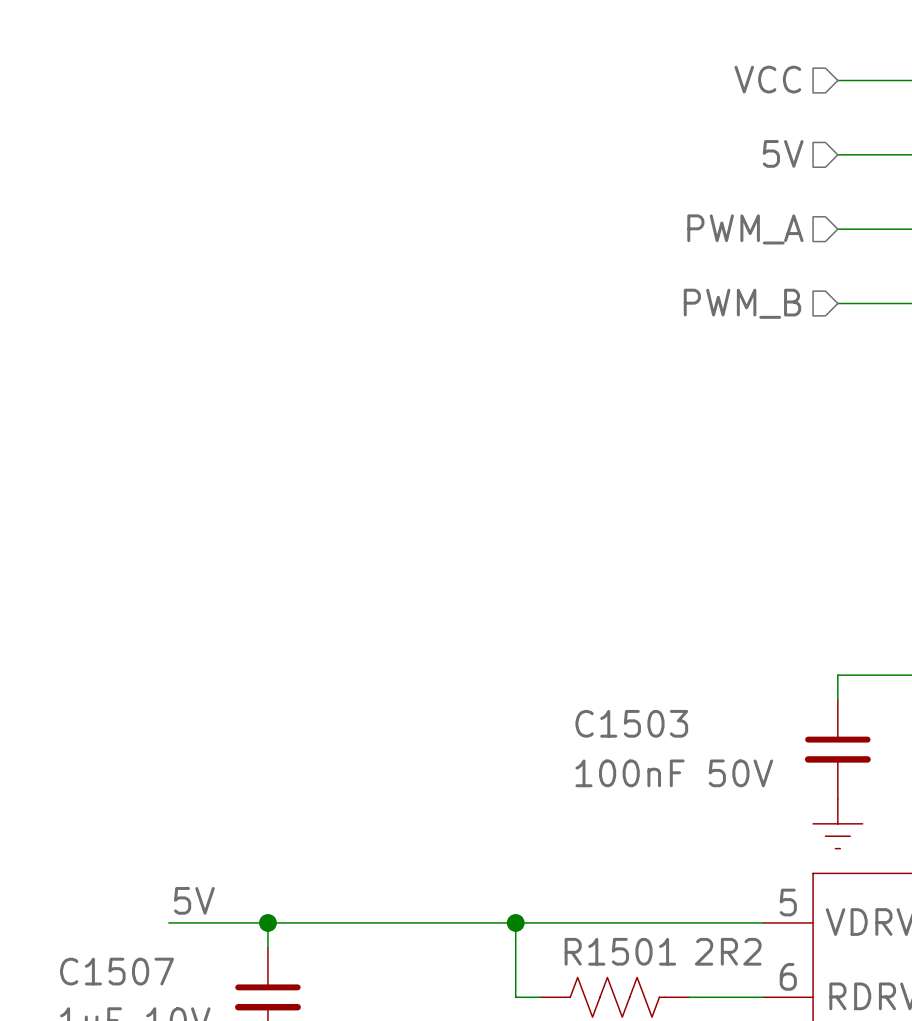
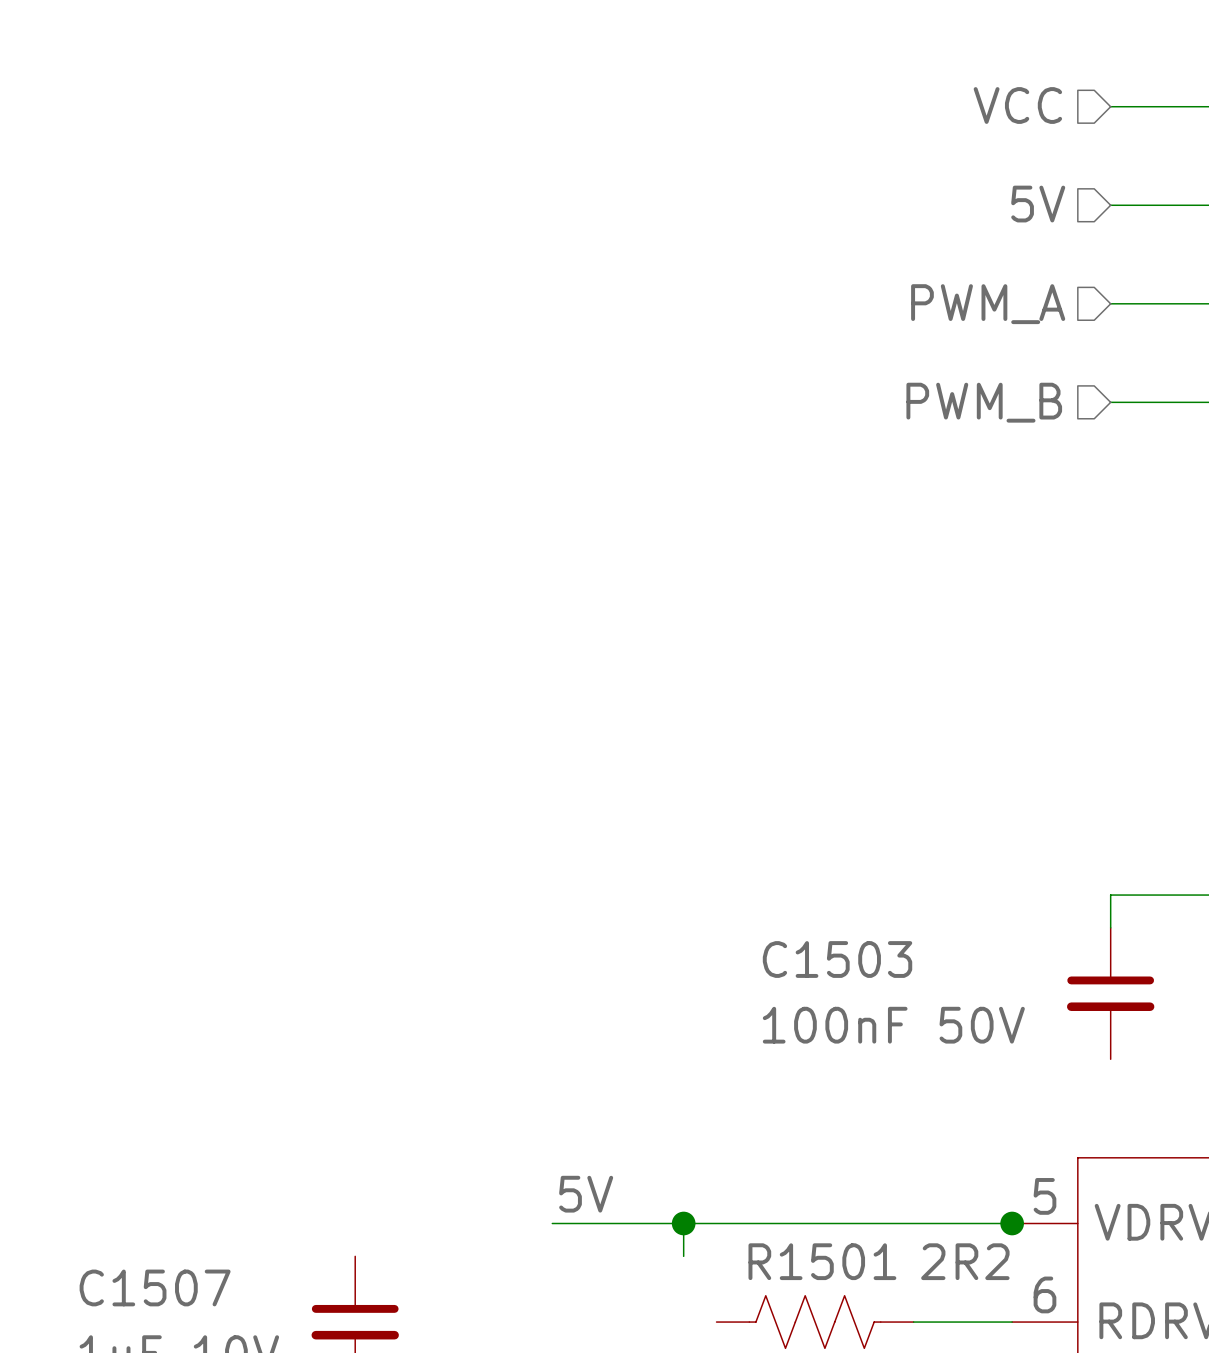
power symbol: (837, 823) -> none
label position: 5V (194, 900) -> 5V (586, 1194)
wire: (168, 922) (416, 922) -> none
wire: (267, 922) (267, 947) -> none
junction: (267, 922) -> none
junction: none -> (1012, 1223)
wire: (515, 947) (515, 997) (540, 997) -> none

